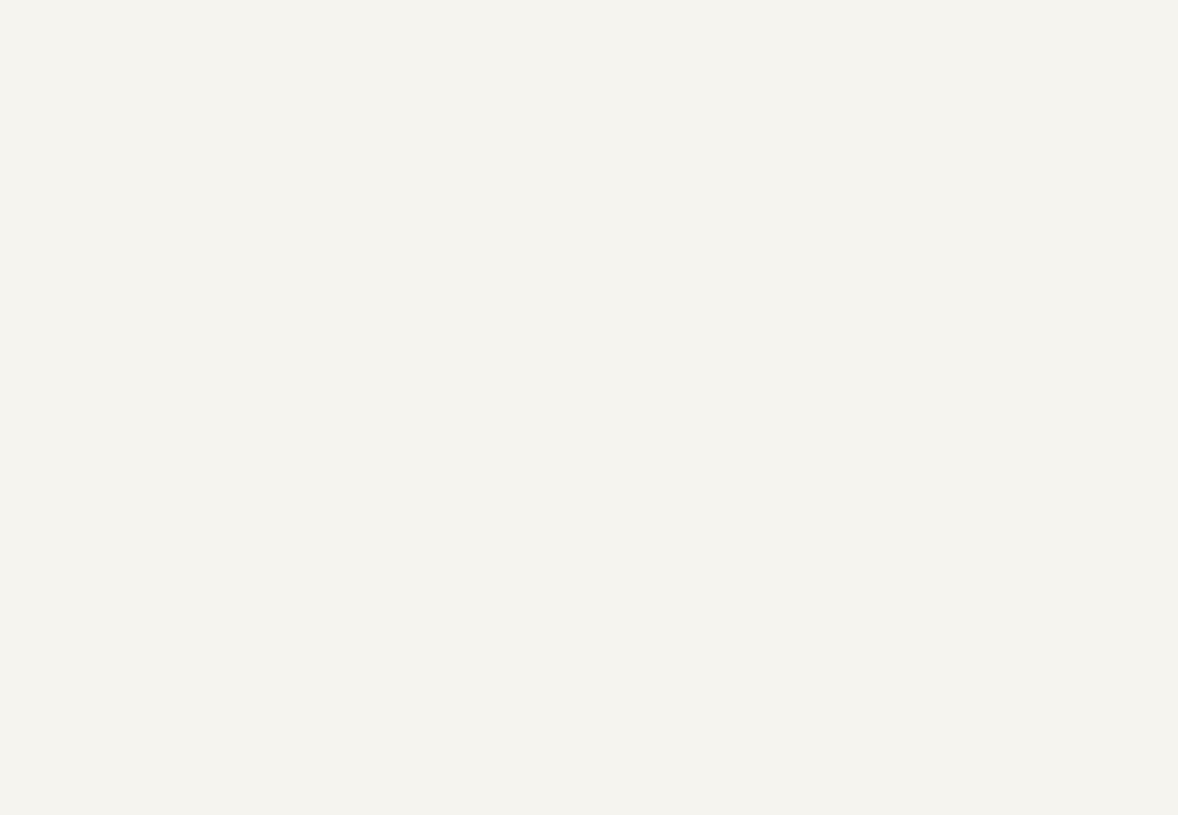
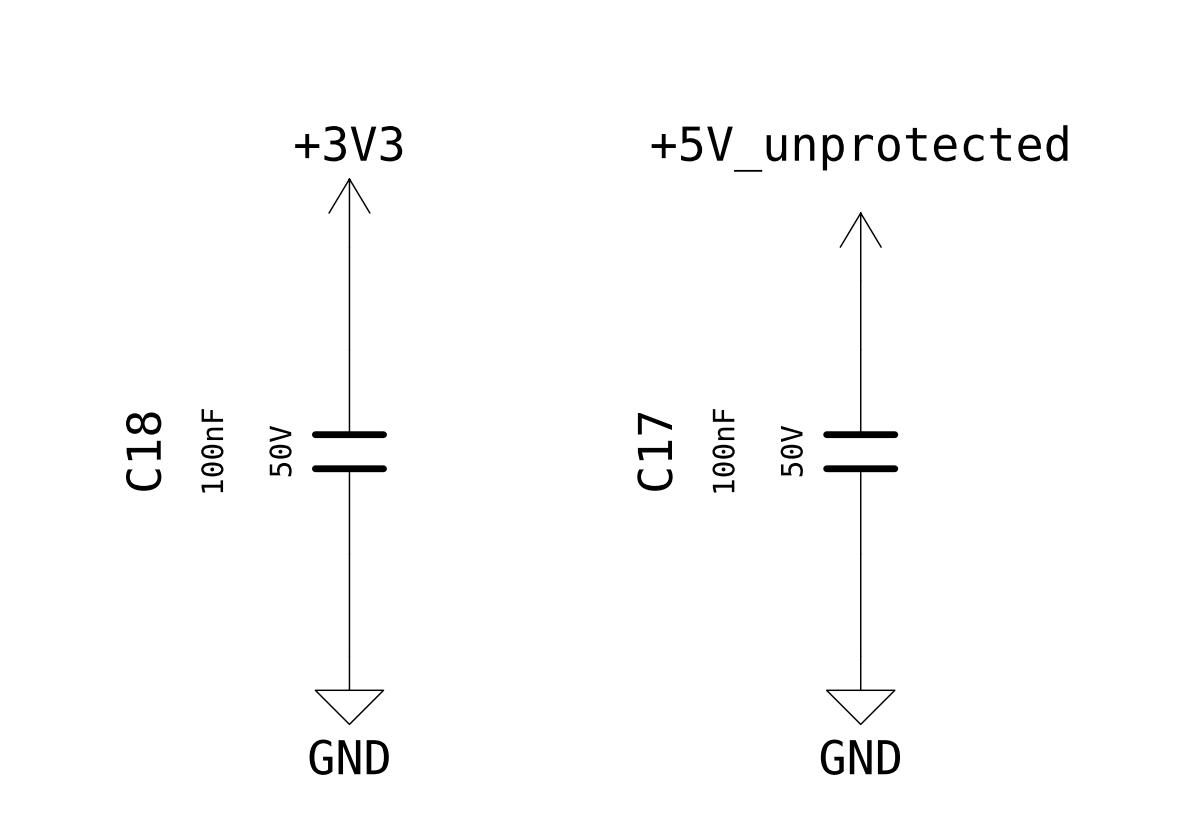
power symbol: none -> +3V3 (349, 213)
wire: none -> (349, 247) (349, 349)
power symbol: none -> +5V_unprotected (860, 247)
wire: none -> (860, 281) (860, 349)
C18: none -> 100nF (349, 451)
C17: none -> 100nF (860, 451)
wire: none -> (349, 553) (349, 656)
wire: none -> (860, 553) (860, 656)
power symbol: none -> GND (349, 690)
power symbol: none -> GND (860, 690)

